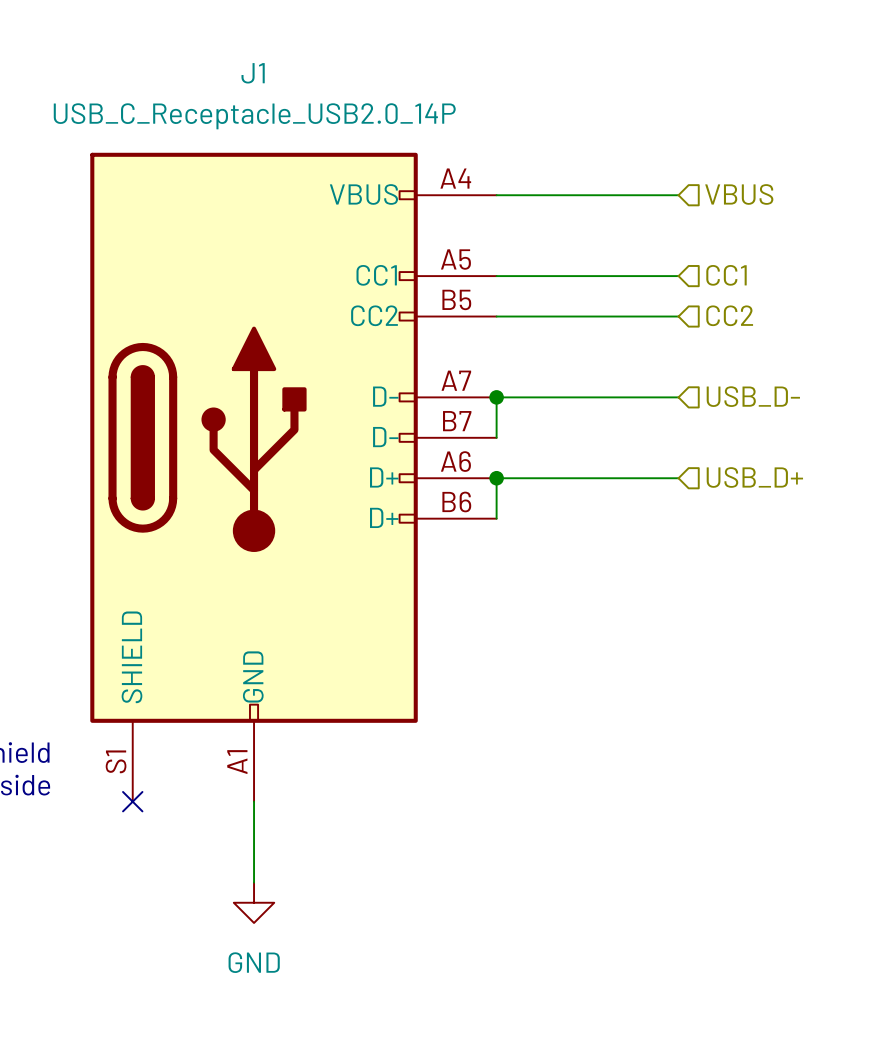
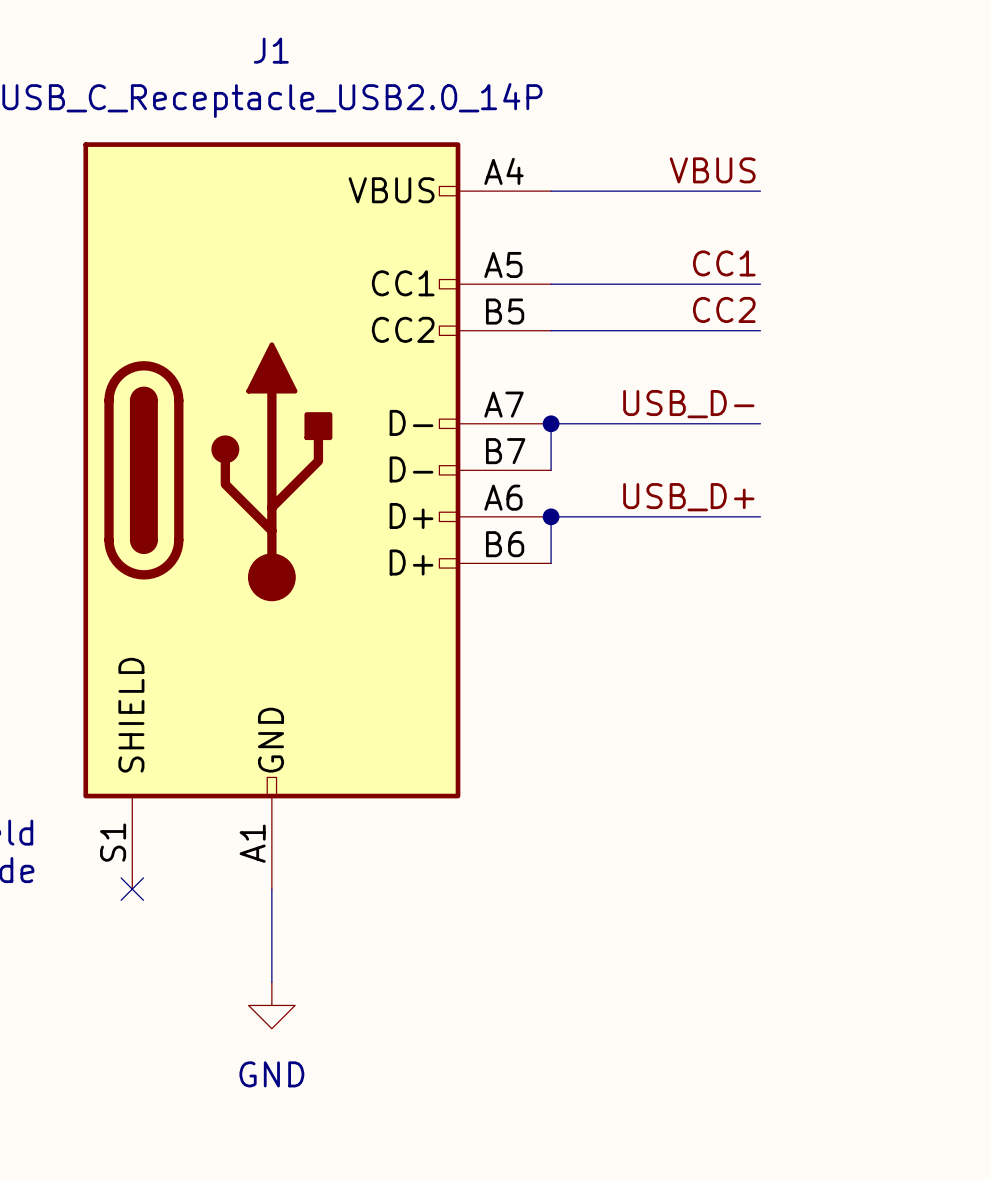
label: none -> VBUS (712, 170)
hierarchical label: VBUS (739, 194) -> none
label: none -> CC1 (724, 263)
hierarchical label: CC1 (726, 275) -> none
label: none -> CC2 (724, 309)
hierarchical label: CC2 (729, 315) -> none
label: none -> USB_D- (688, 404)
hierarchical label: USB_D- (753, 396) -> none
label: none -> USB_D+ (688, 497)
hierarchical label: USB_D+ (754, 477) -> none

